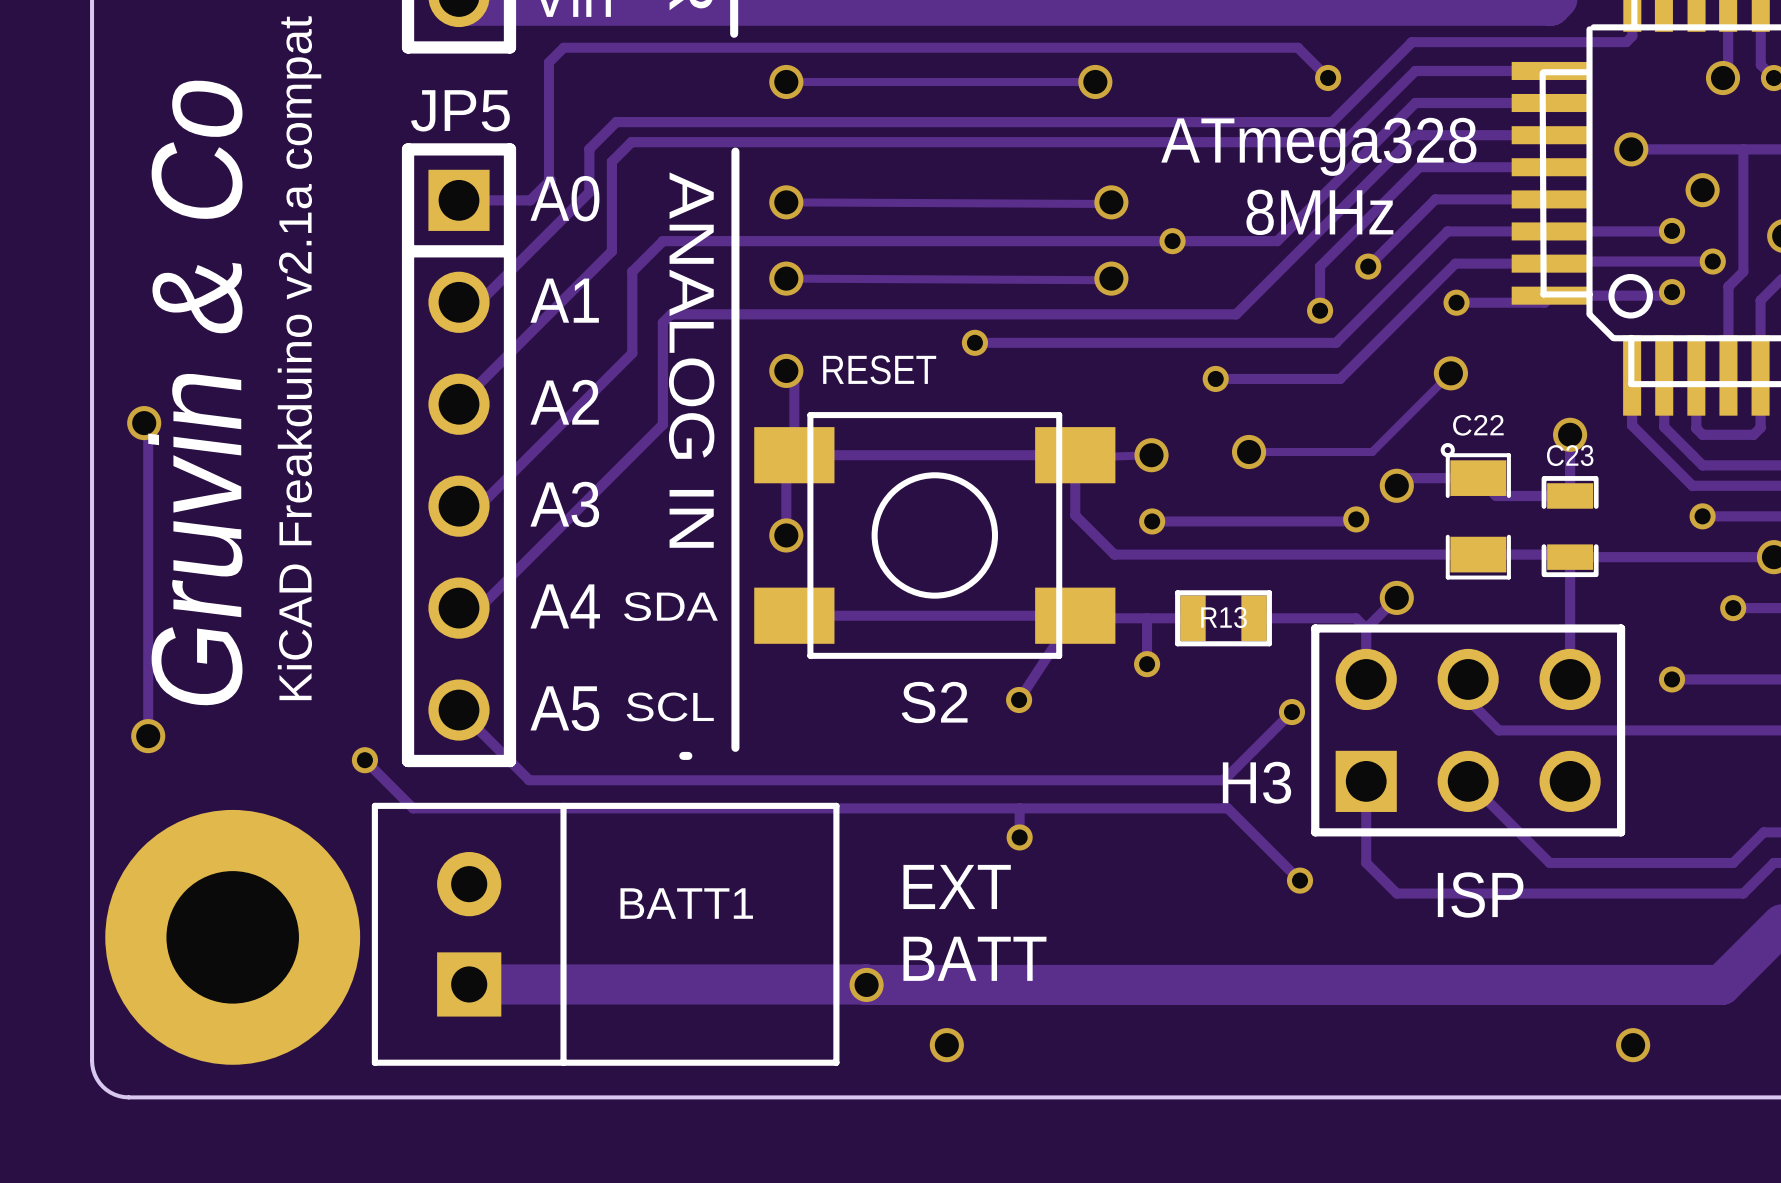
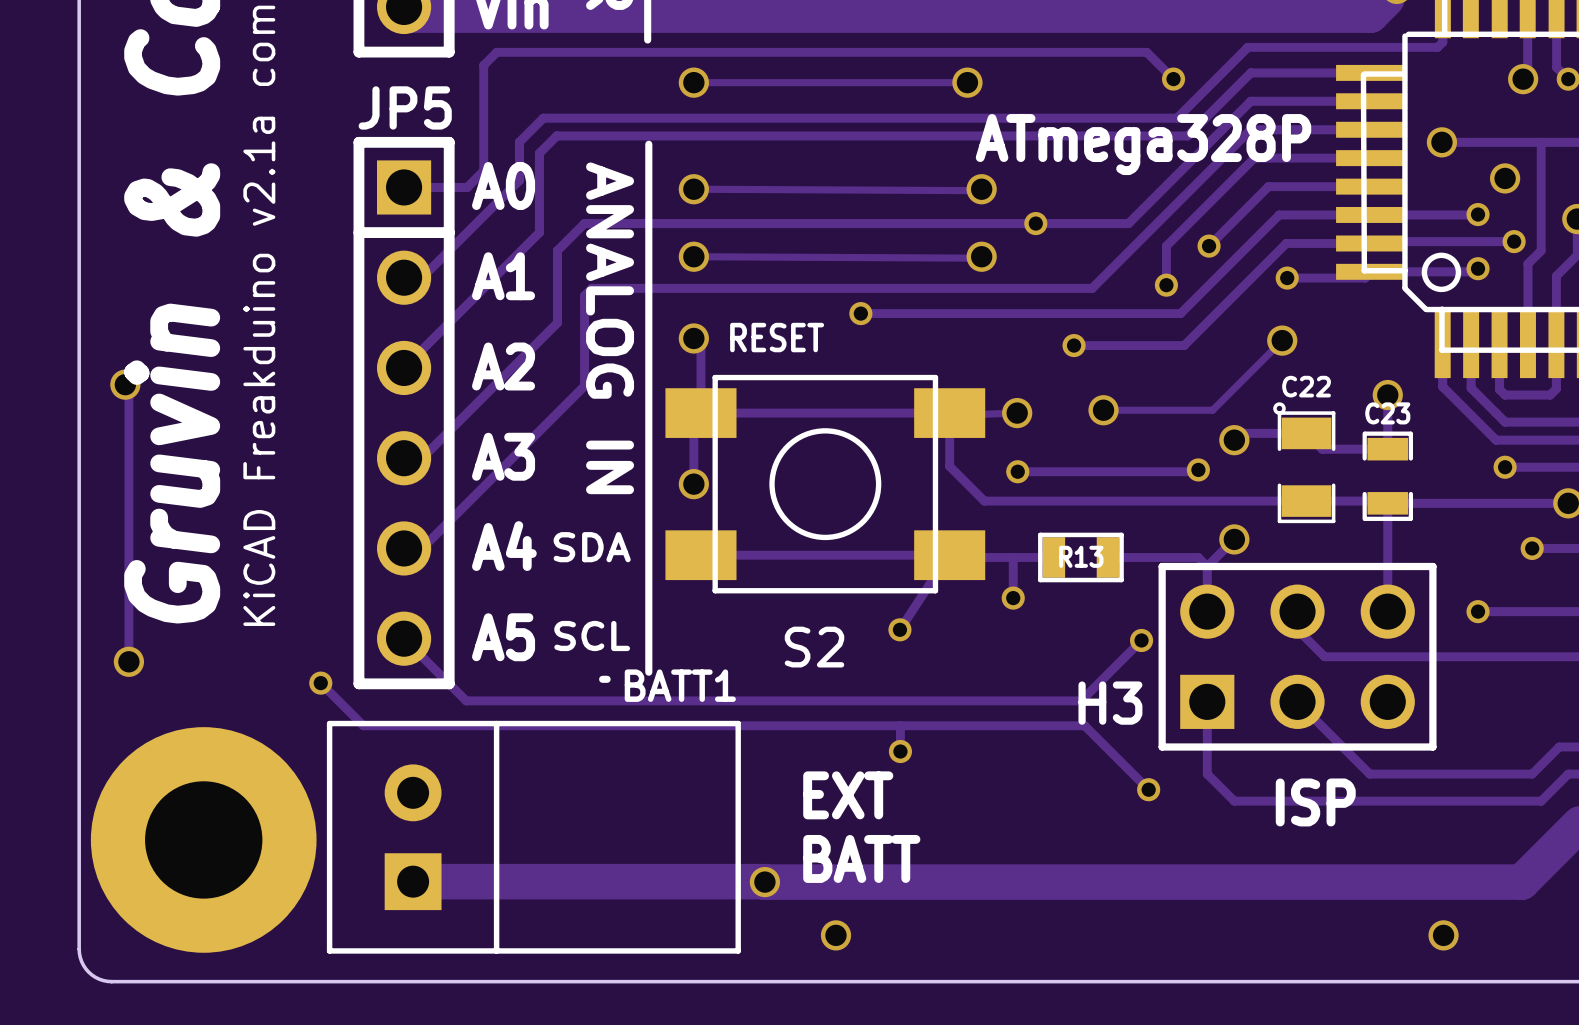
text: ATmega328 (1318, 146) -> ATmega328P (1143, 144)
text: 8MHz (1319, 212) -> none
S2 name position: S2 (934, 702) -> S2 (814, 647)
BATT1 name position: BATT1 (686, 903) -> BATT1 (680, 685)

